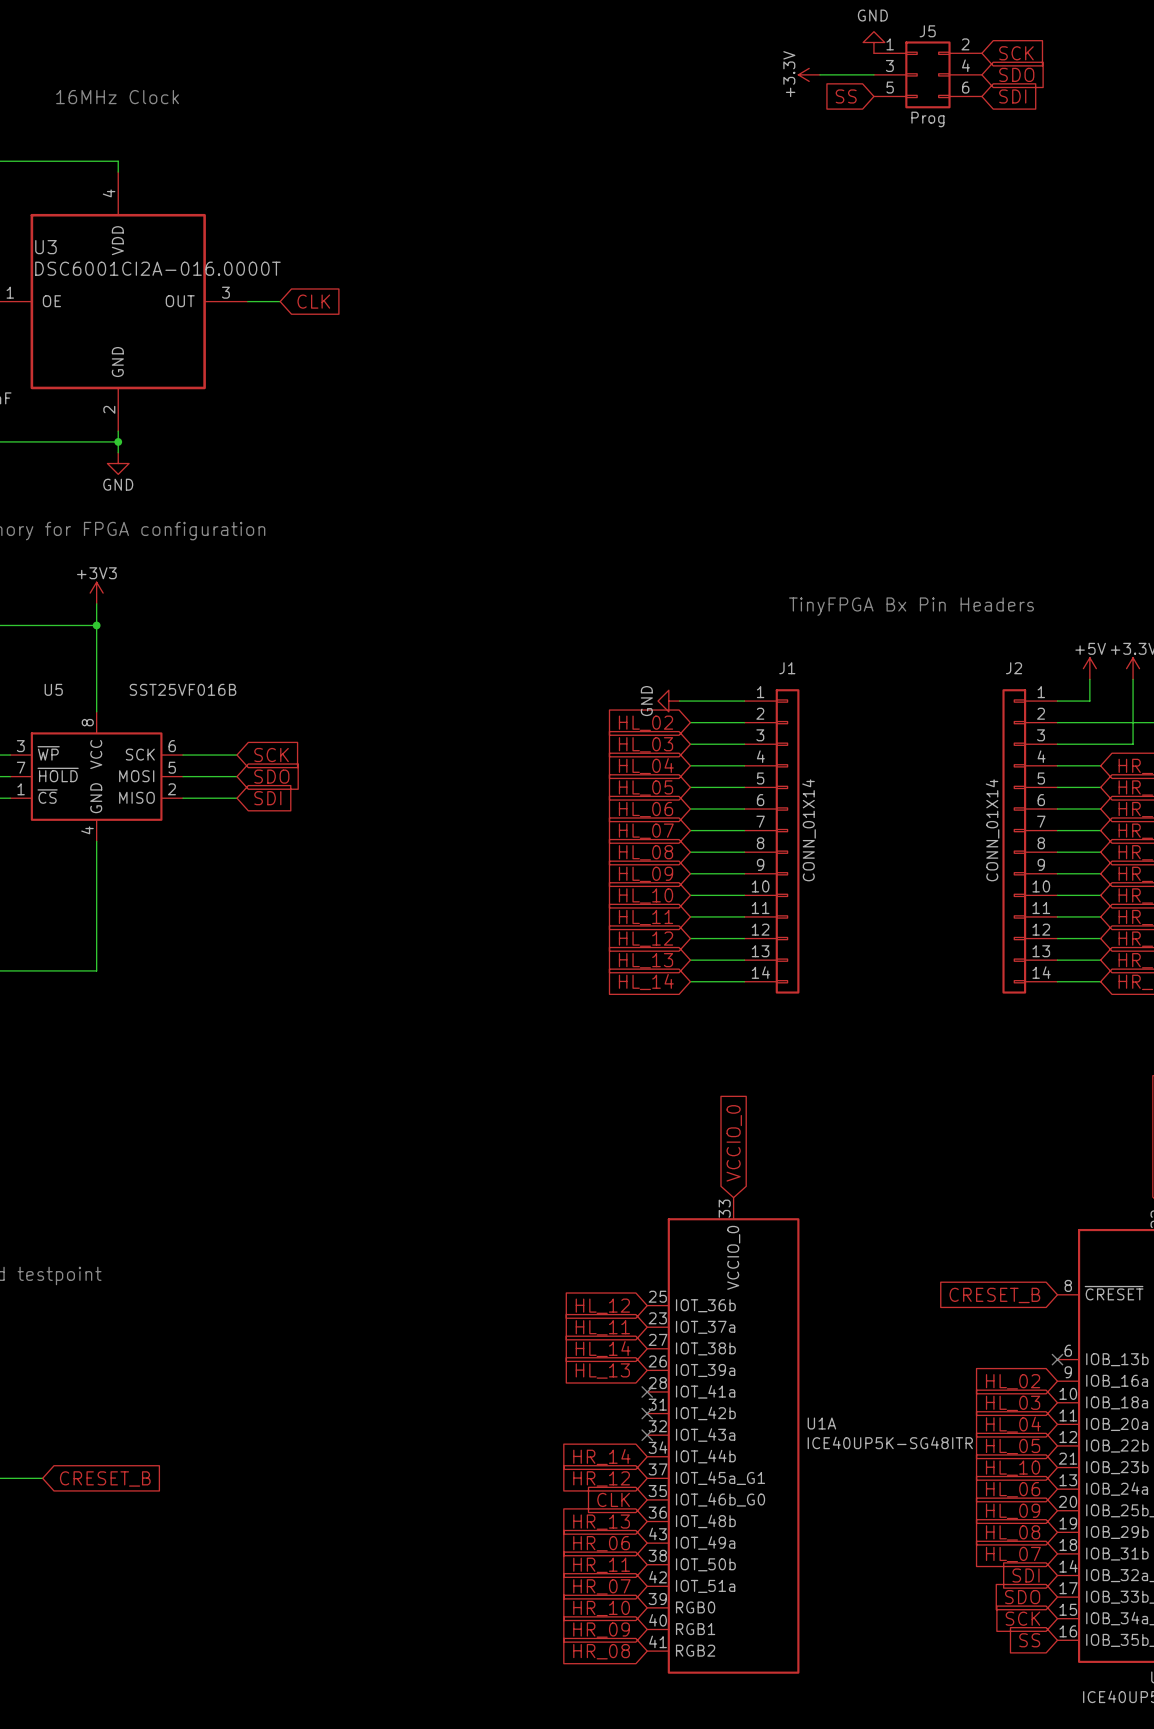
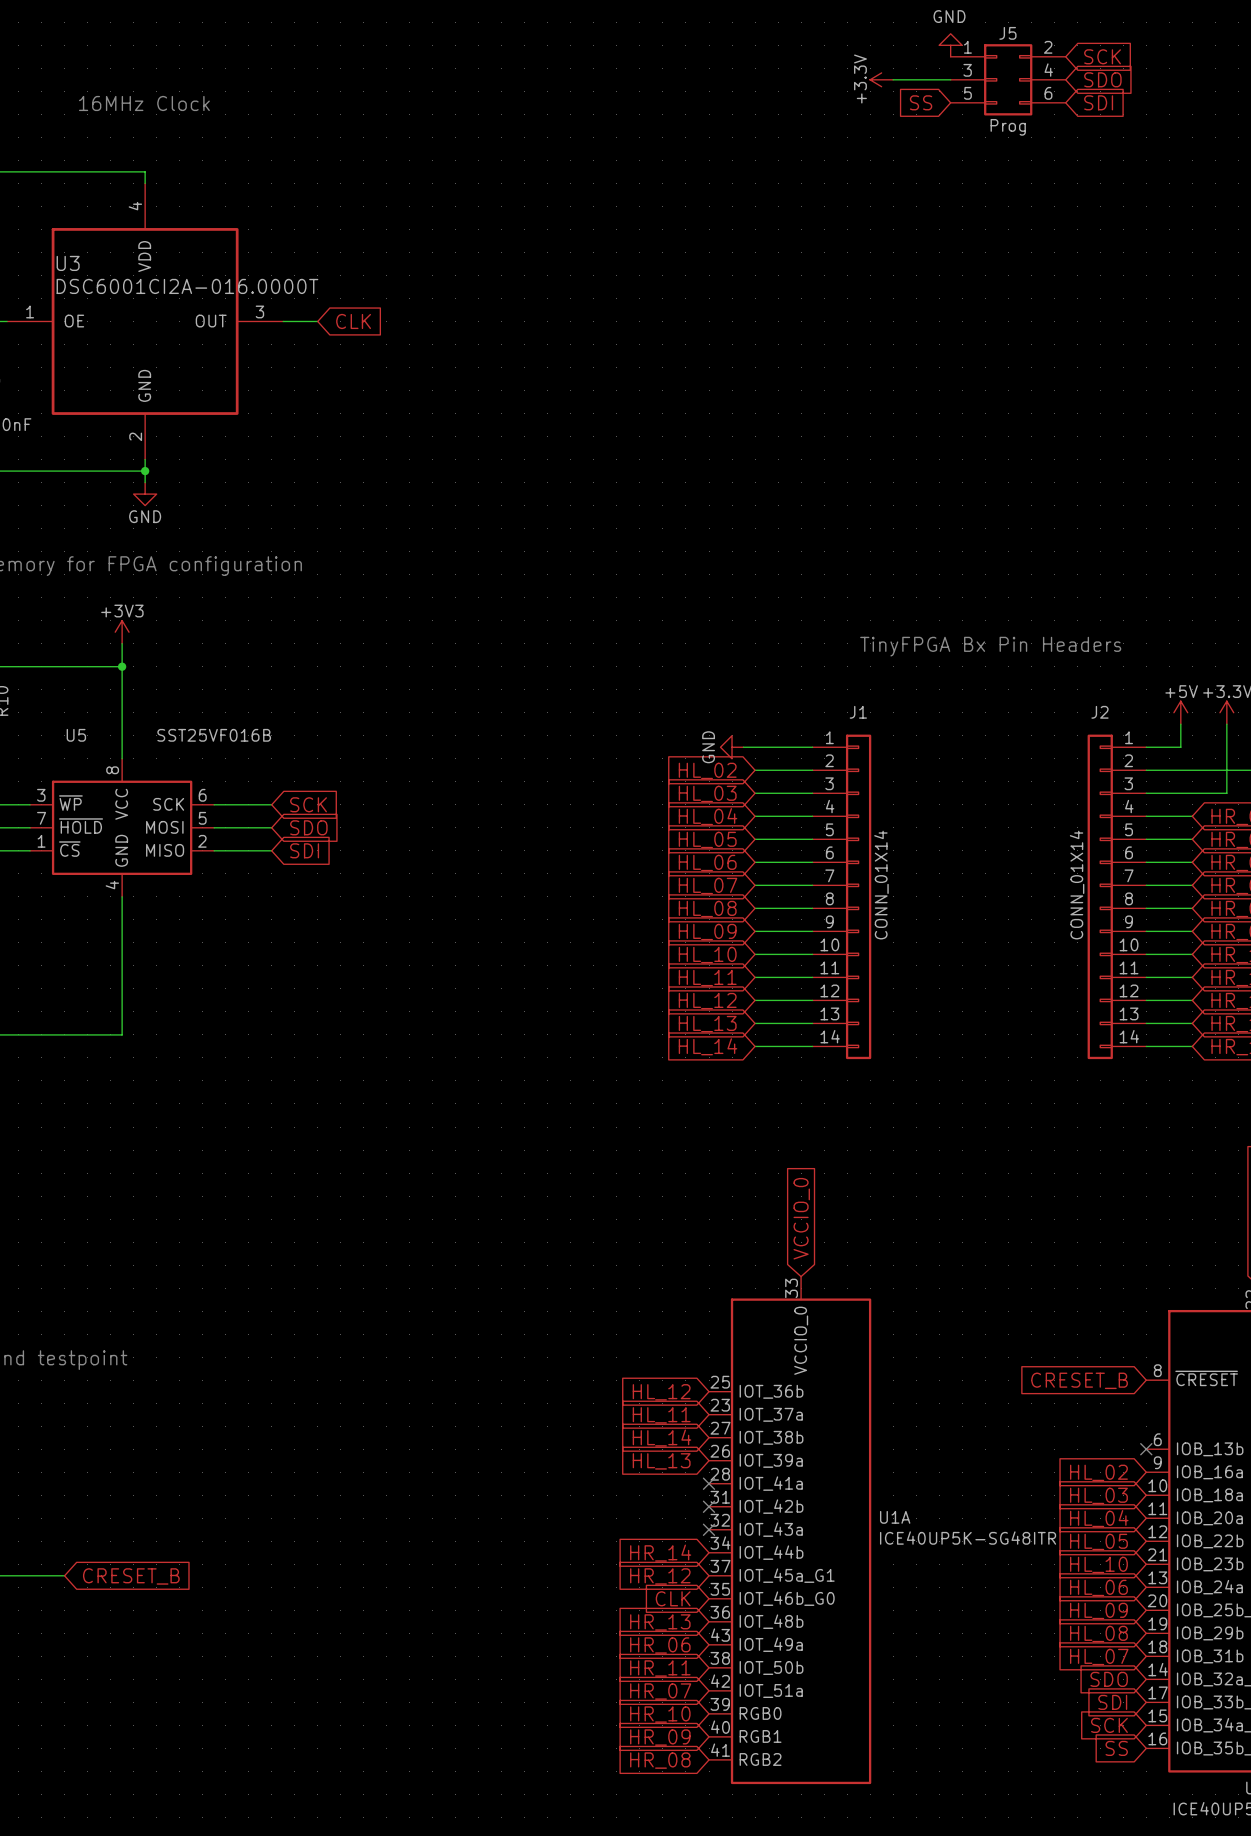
global label: SDI (1026, 1575) -> SDO (1109, 1679)
global label: SDO (1022, 1597) -> SDI (1112, 1702)

